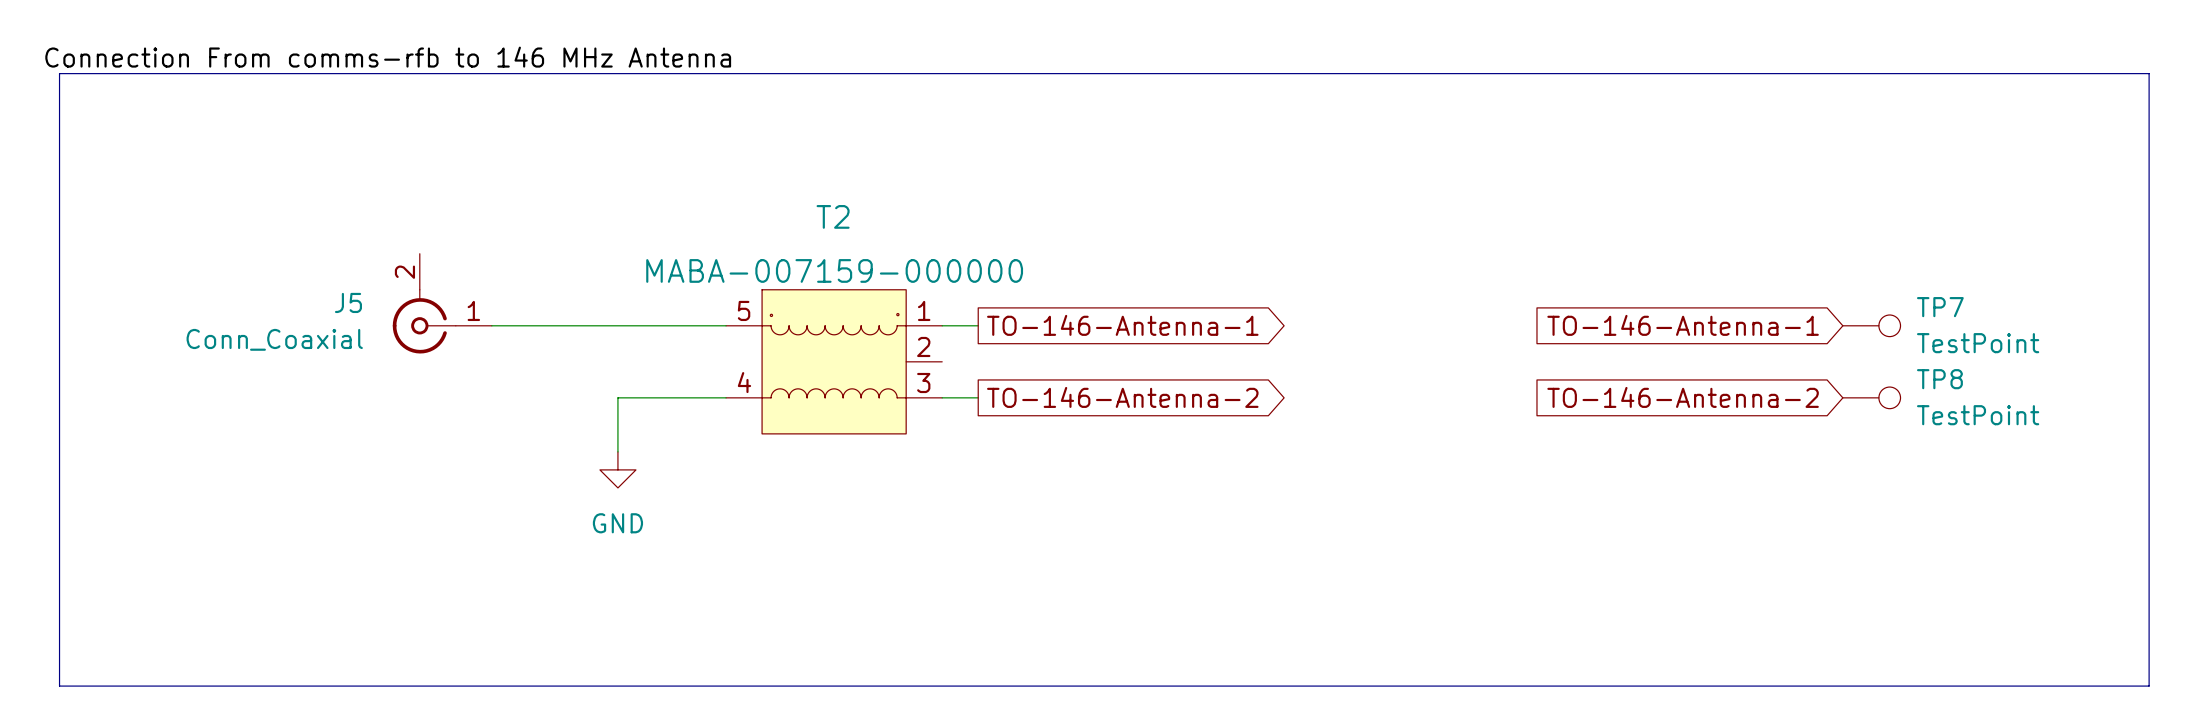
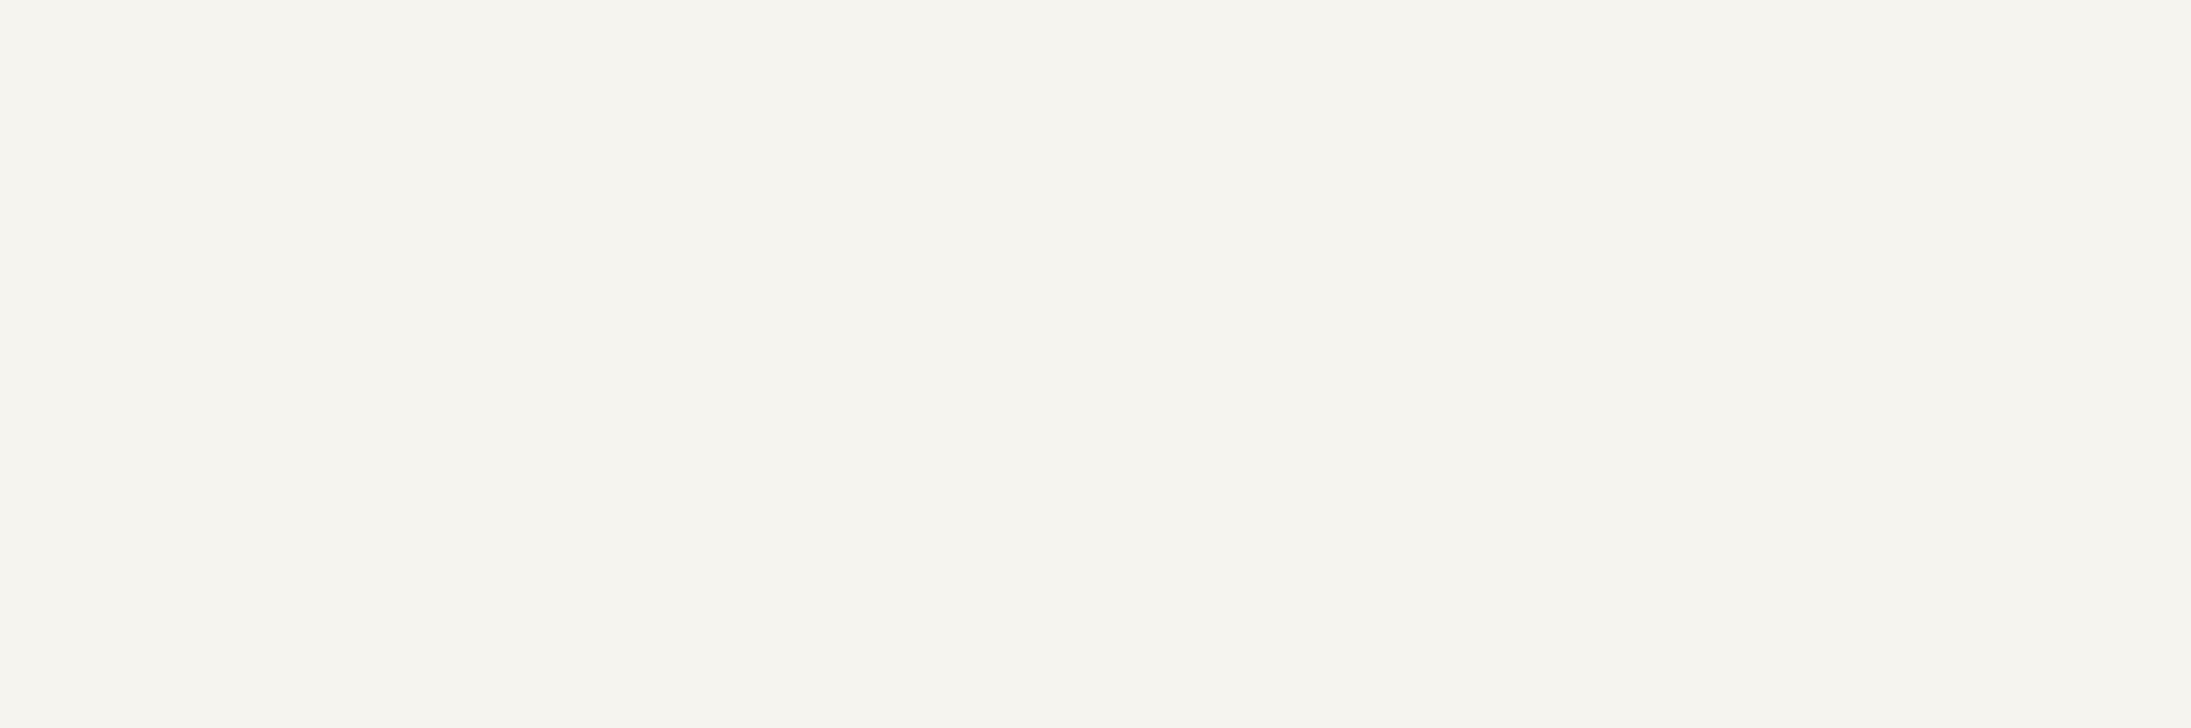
label: Connection From comms-rfb to 146 MHz Antenna (388, 57) -> none
line: (59, 73) (59, 686) (2149, 686) (2149, 73) (59, 73) -> none
J5: Conn_Coaxial (442, 303) -> none
wire: (491, 325) (726, 325) -> none
wire: (942, 325) (978, 325) -> none
global label: TO-146-Antenna-1 (1122, 325) -> none
global label: TO-146-Antenna-1 (1683, 325) -> none
TP7: TestPoint (1871, 325) -> none
T2: MABA-007159-000000 (834, 361) -> none
wire: (726, 397) (617, 397) (617, 451) -> none
wire: (942, 397) (978, 397) -> none
global label: TO-146-Antenna-2 (1122, 397) -> none
global label: TO-146-Antenna-2 (1683, 397) -> none
TP8: TestPoint (1871, 397) -> none
power symbol: GND (617, 469) -> none

